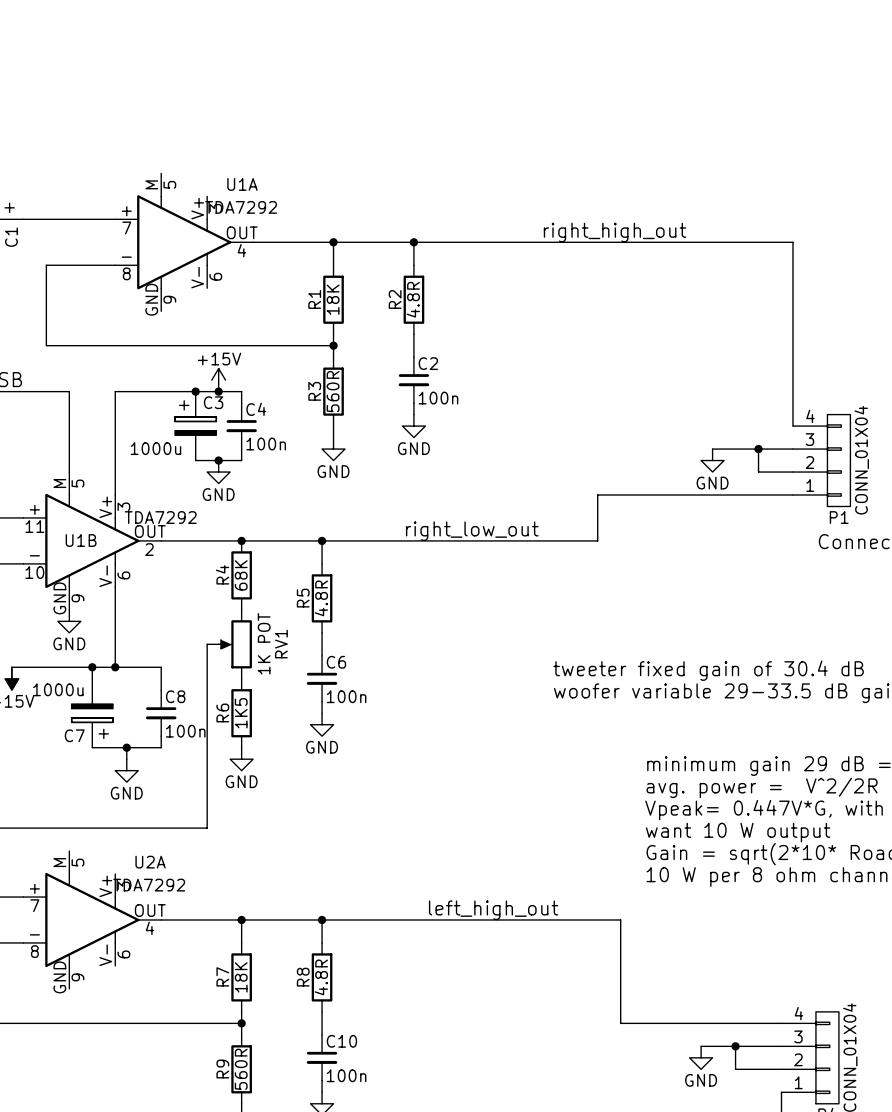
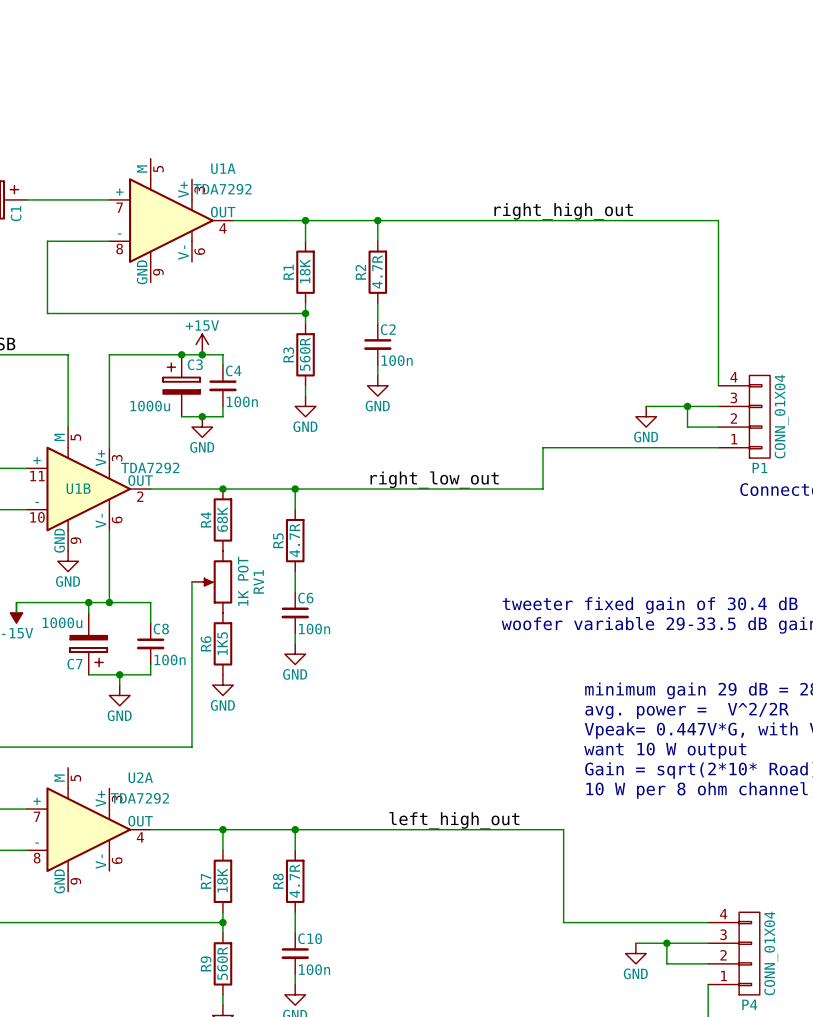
R2 value: 4.8R (413, 299) -> 4.7R (377, 271)
R5 value: 4.8R (321, 598) -> 4.7R (294, 540)
R8 value: 4.8R (321, 977) -> 4.7R (294, 880)

